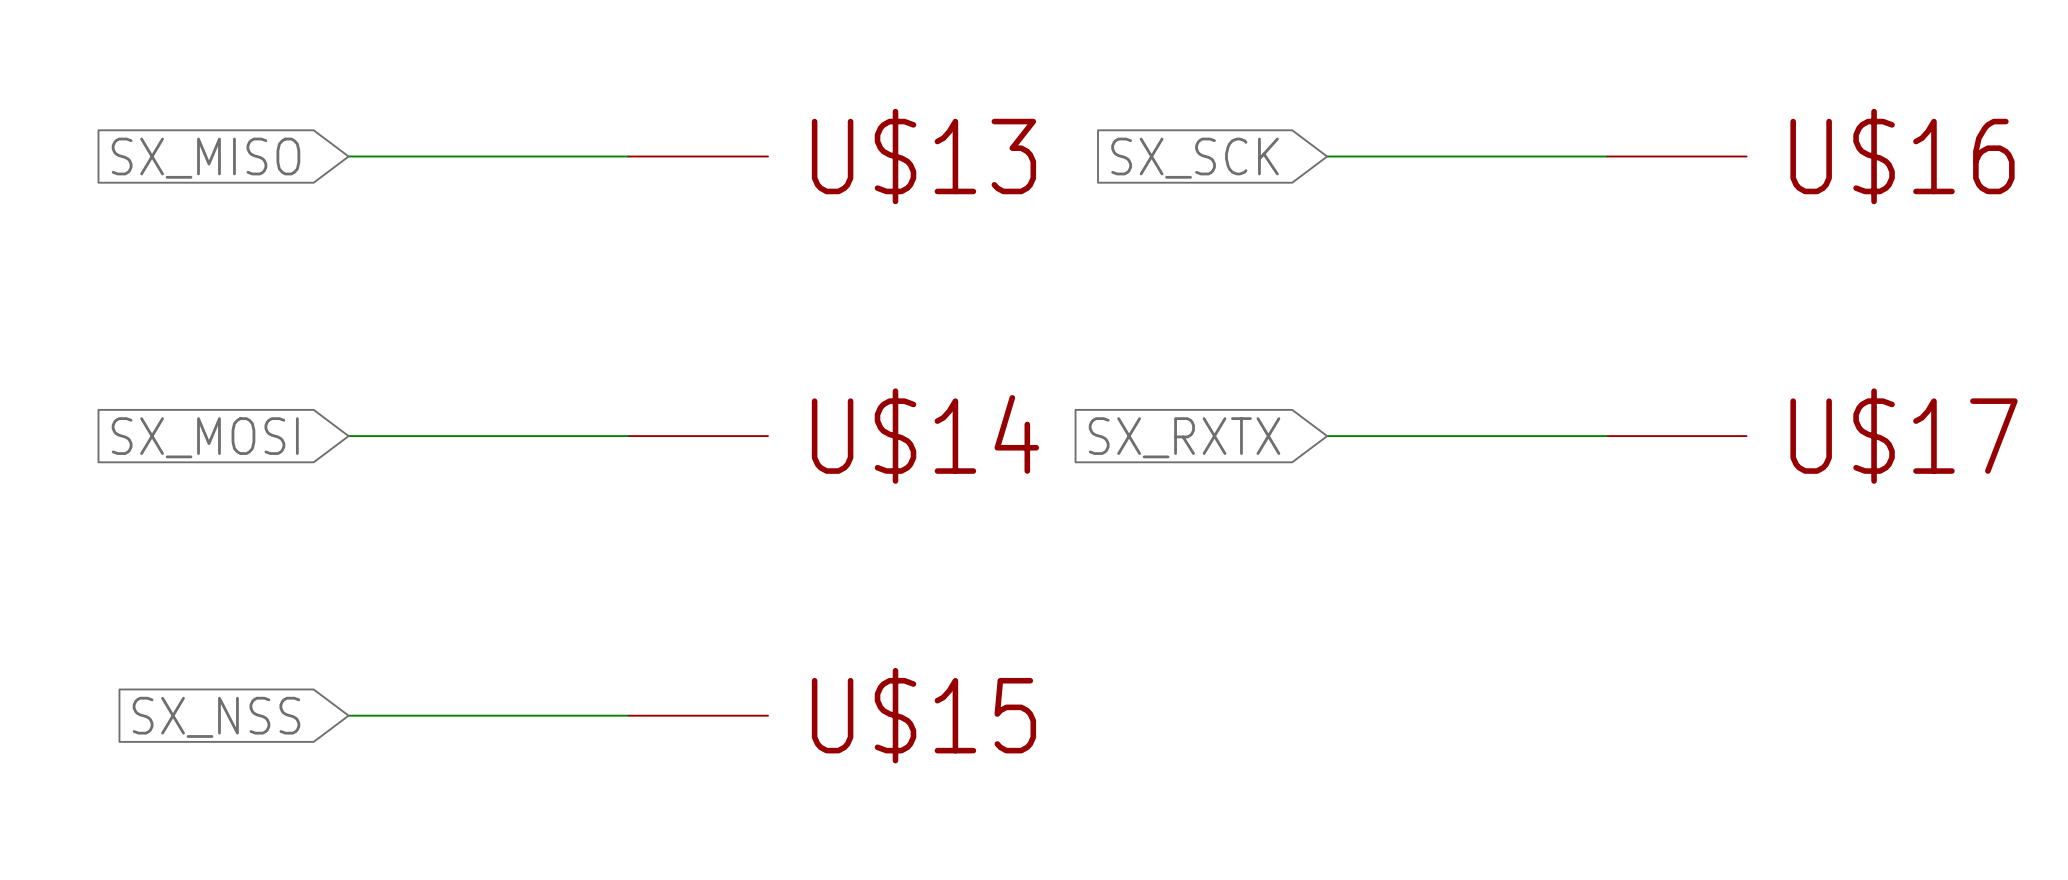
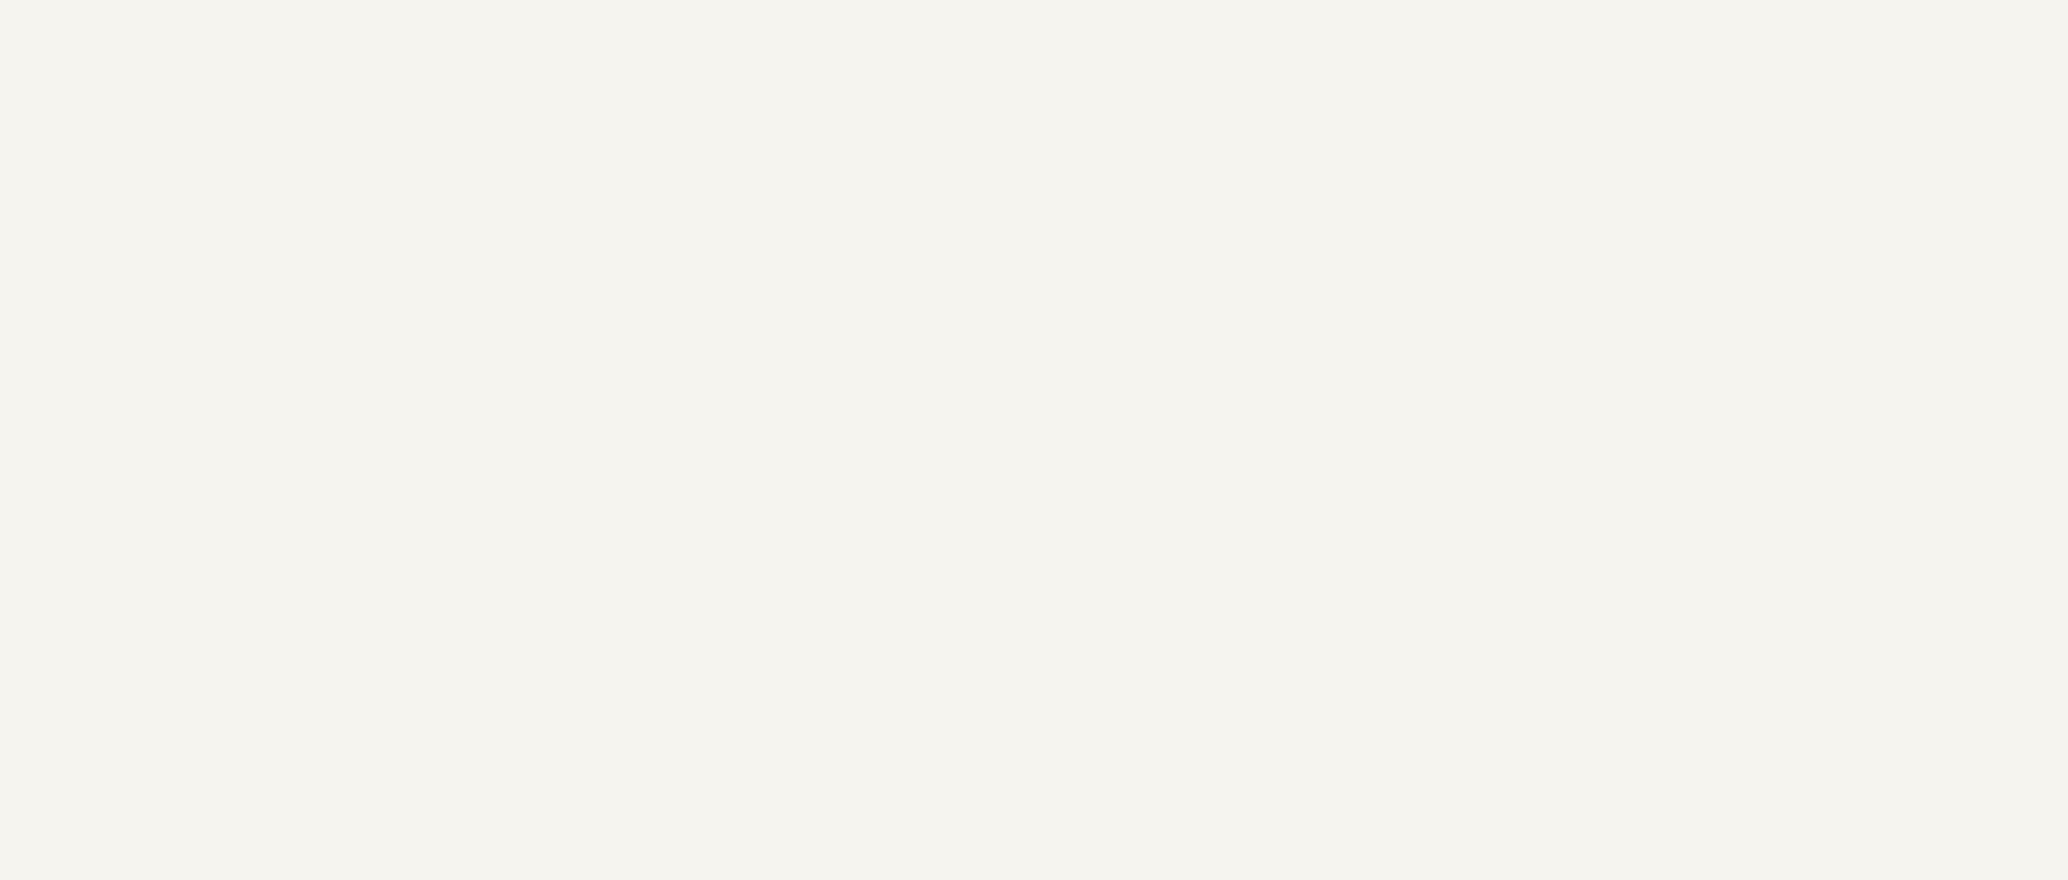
wire: (348, 156) (628, 156) -> none
U$13: (698, 156) -> none
wire: (1327, 156) (1606, 156) -> none
U$16: (1676, 156) -> none
global label: SX_MISO (205, 158) -> none
global label: SX_SCK (1195, 158) -> none
wire: (348, 436) (628, 436) -> none
U$14: (698, 436) -> none
wire: (1327, 436) (1606, 436) -> none
U$17: (1676, 436) -> none
global label: SX_MOSI (205, 437) -> none
global label: SX_RXTX (1184, 437) -> none
wire: (348, 715) (628, 715) -> none
U$15: (698, 715) -> none
global label: SX_NSS (216, 717) -> none

